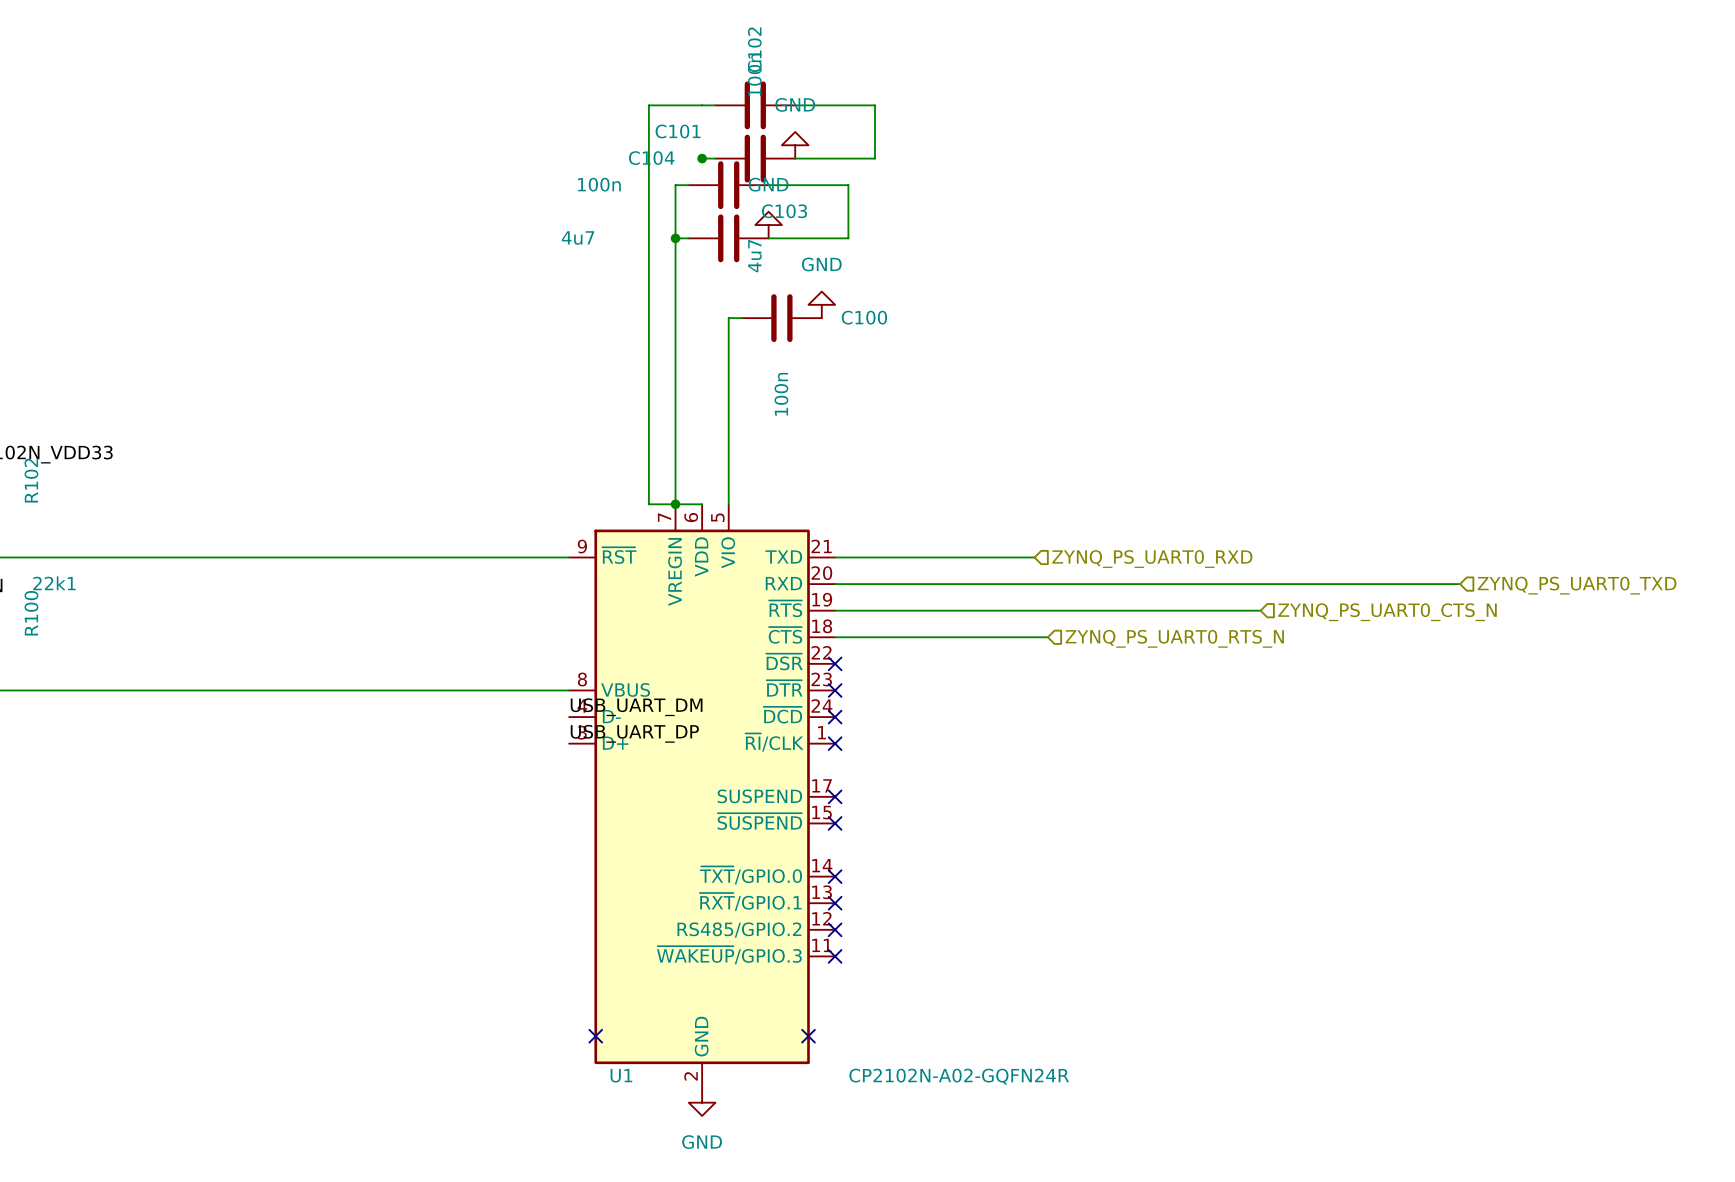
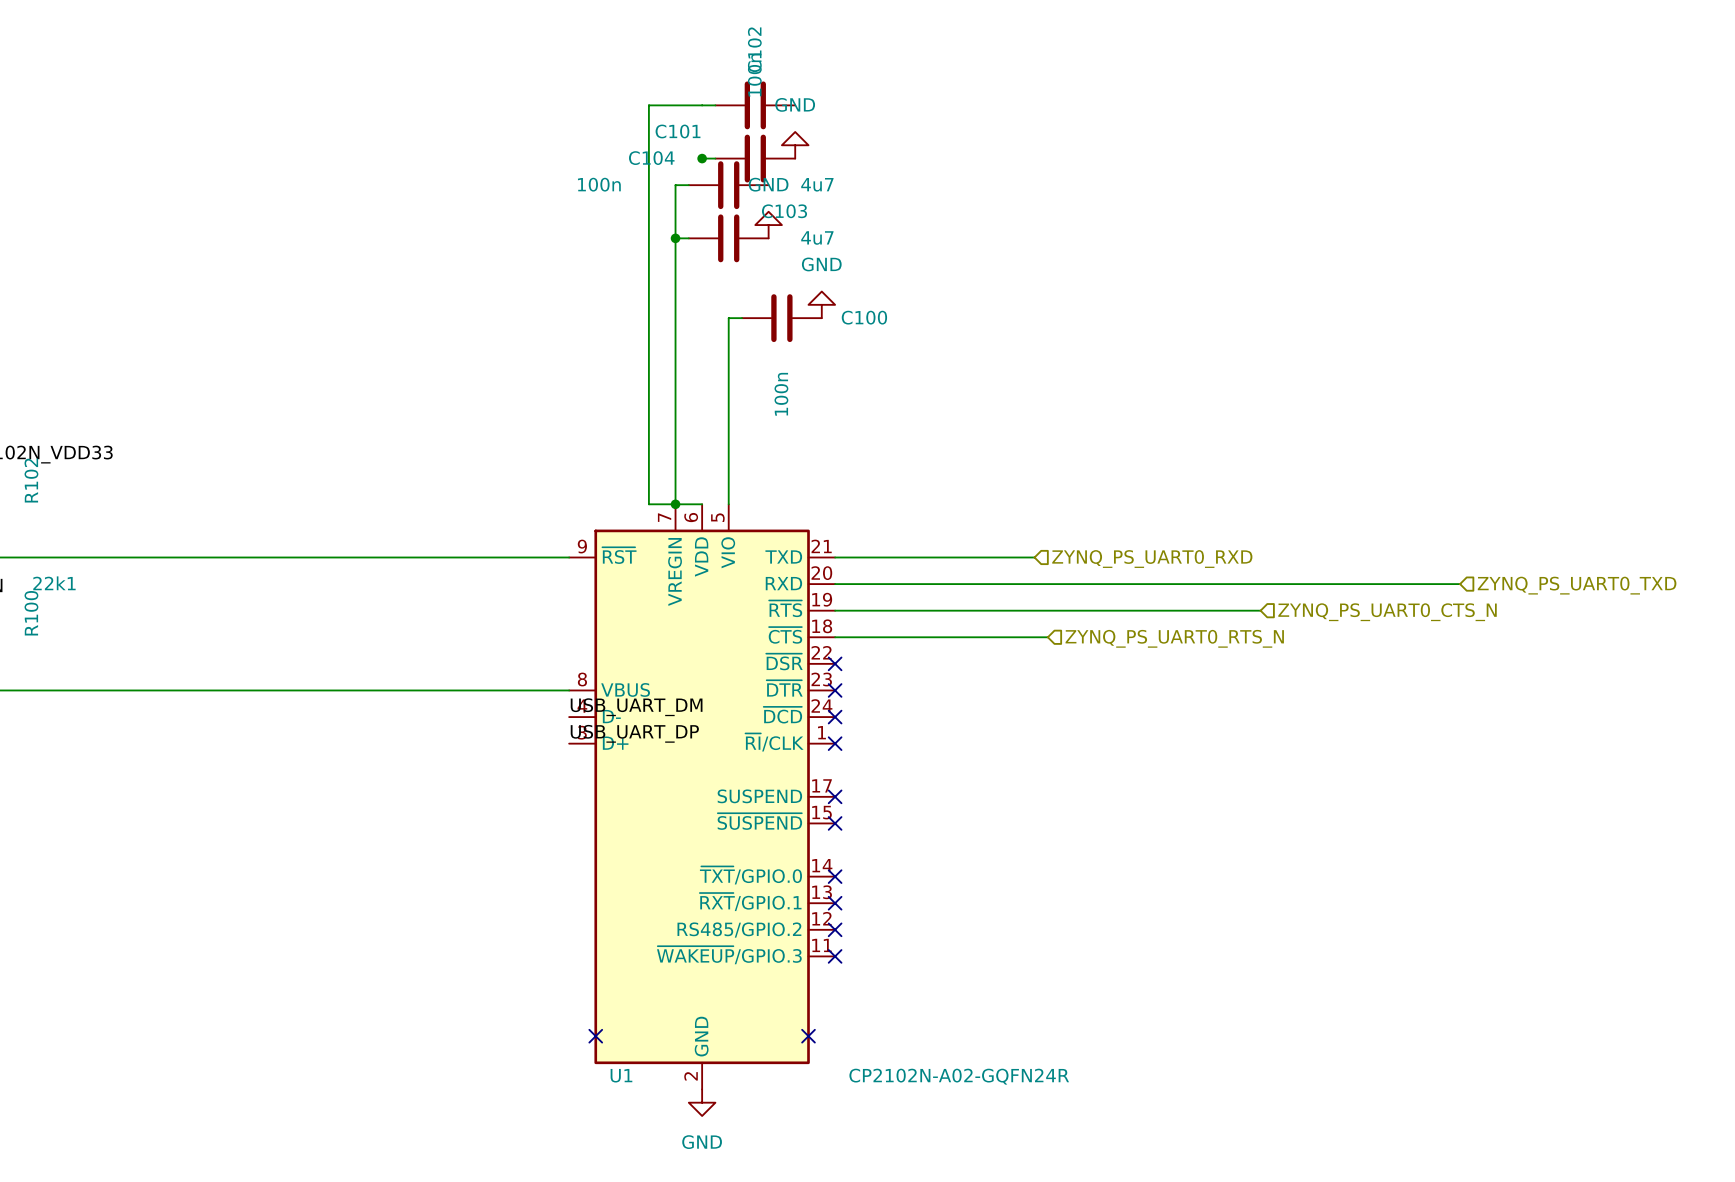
wire: (795, 105) (874, 105) (874, 158) (795, 158) -> none
wire: (768, 185) (848, 185) (848, 238) (768, 238) -> none
C103 value position: 4u7 (578, 237) -> 4u7 (817, 237)
C101 value rotation: 0° (754, 256) -> 90° clockwise (817, 184)
C101 value position: 4u7 (754, 256) -> 4u7 (817, 184)

